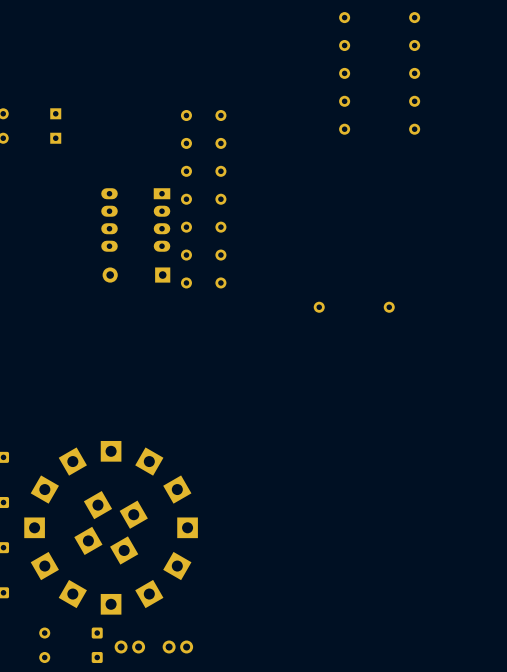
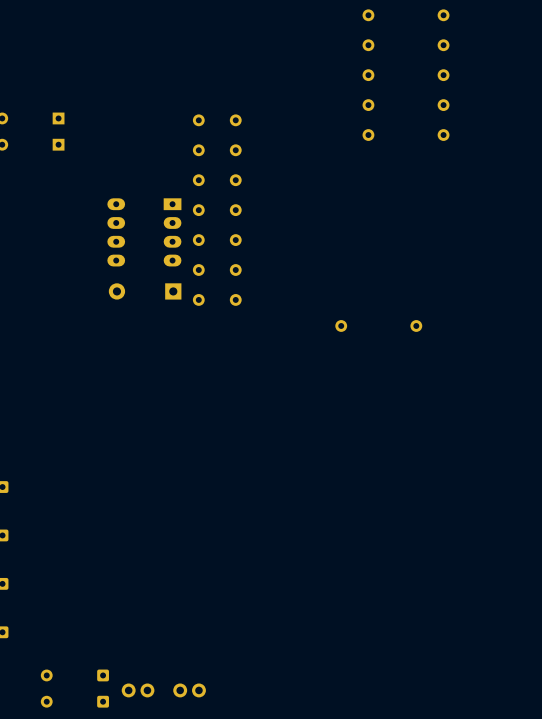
part: (111, 527) -> none

